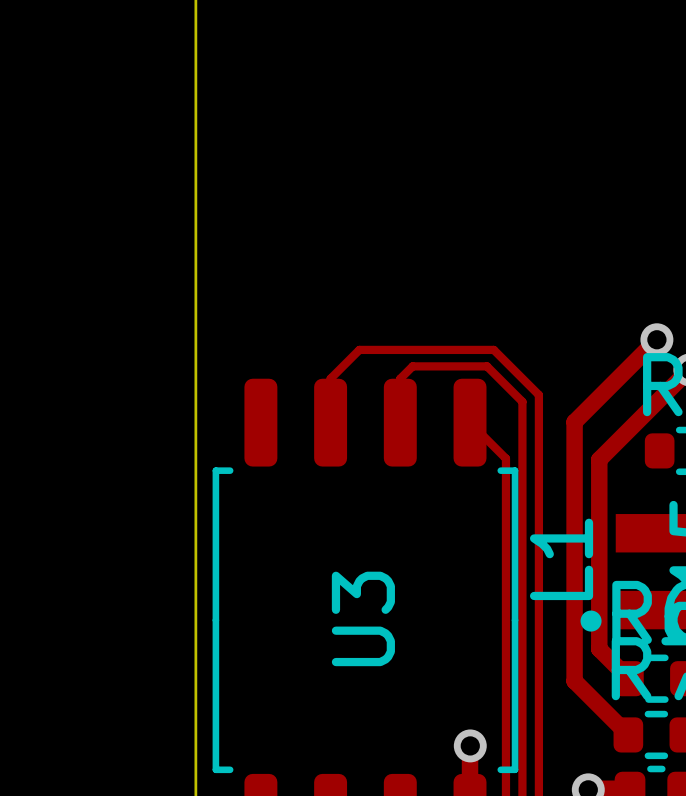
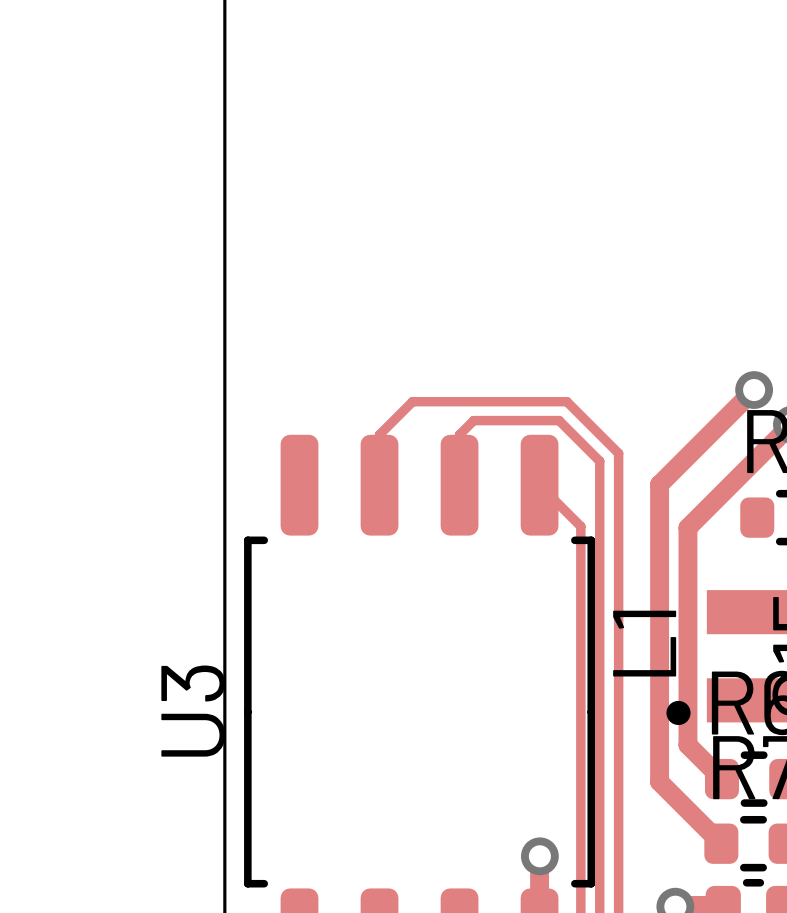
U3 name position: U3 (363, 618) -> U3 (193, 711)

